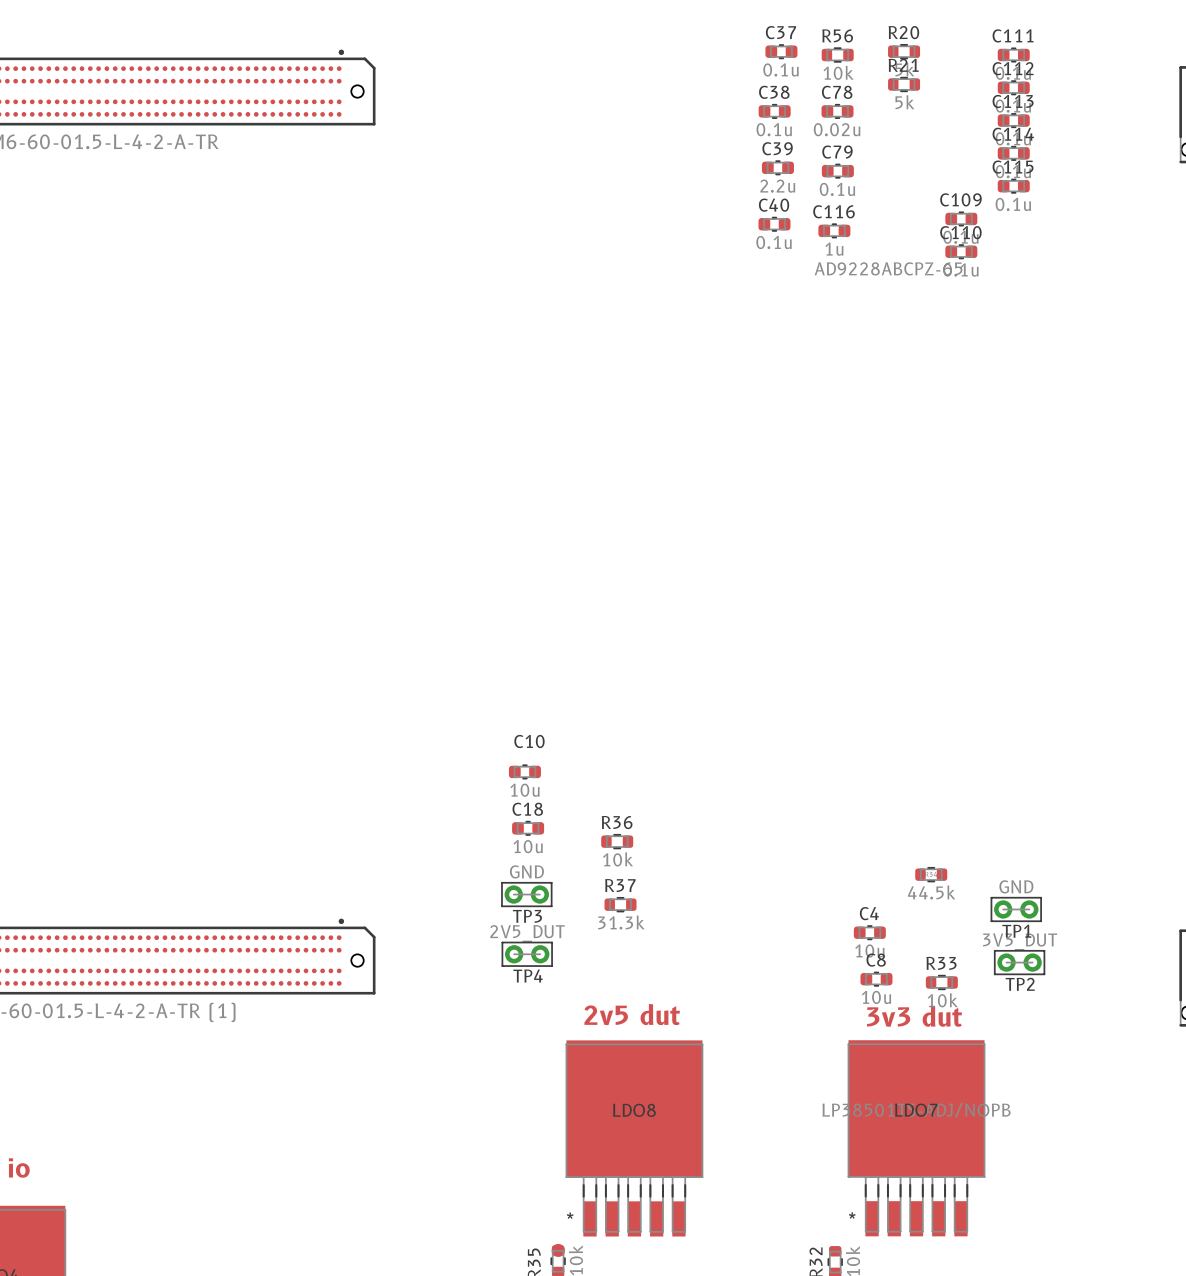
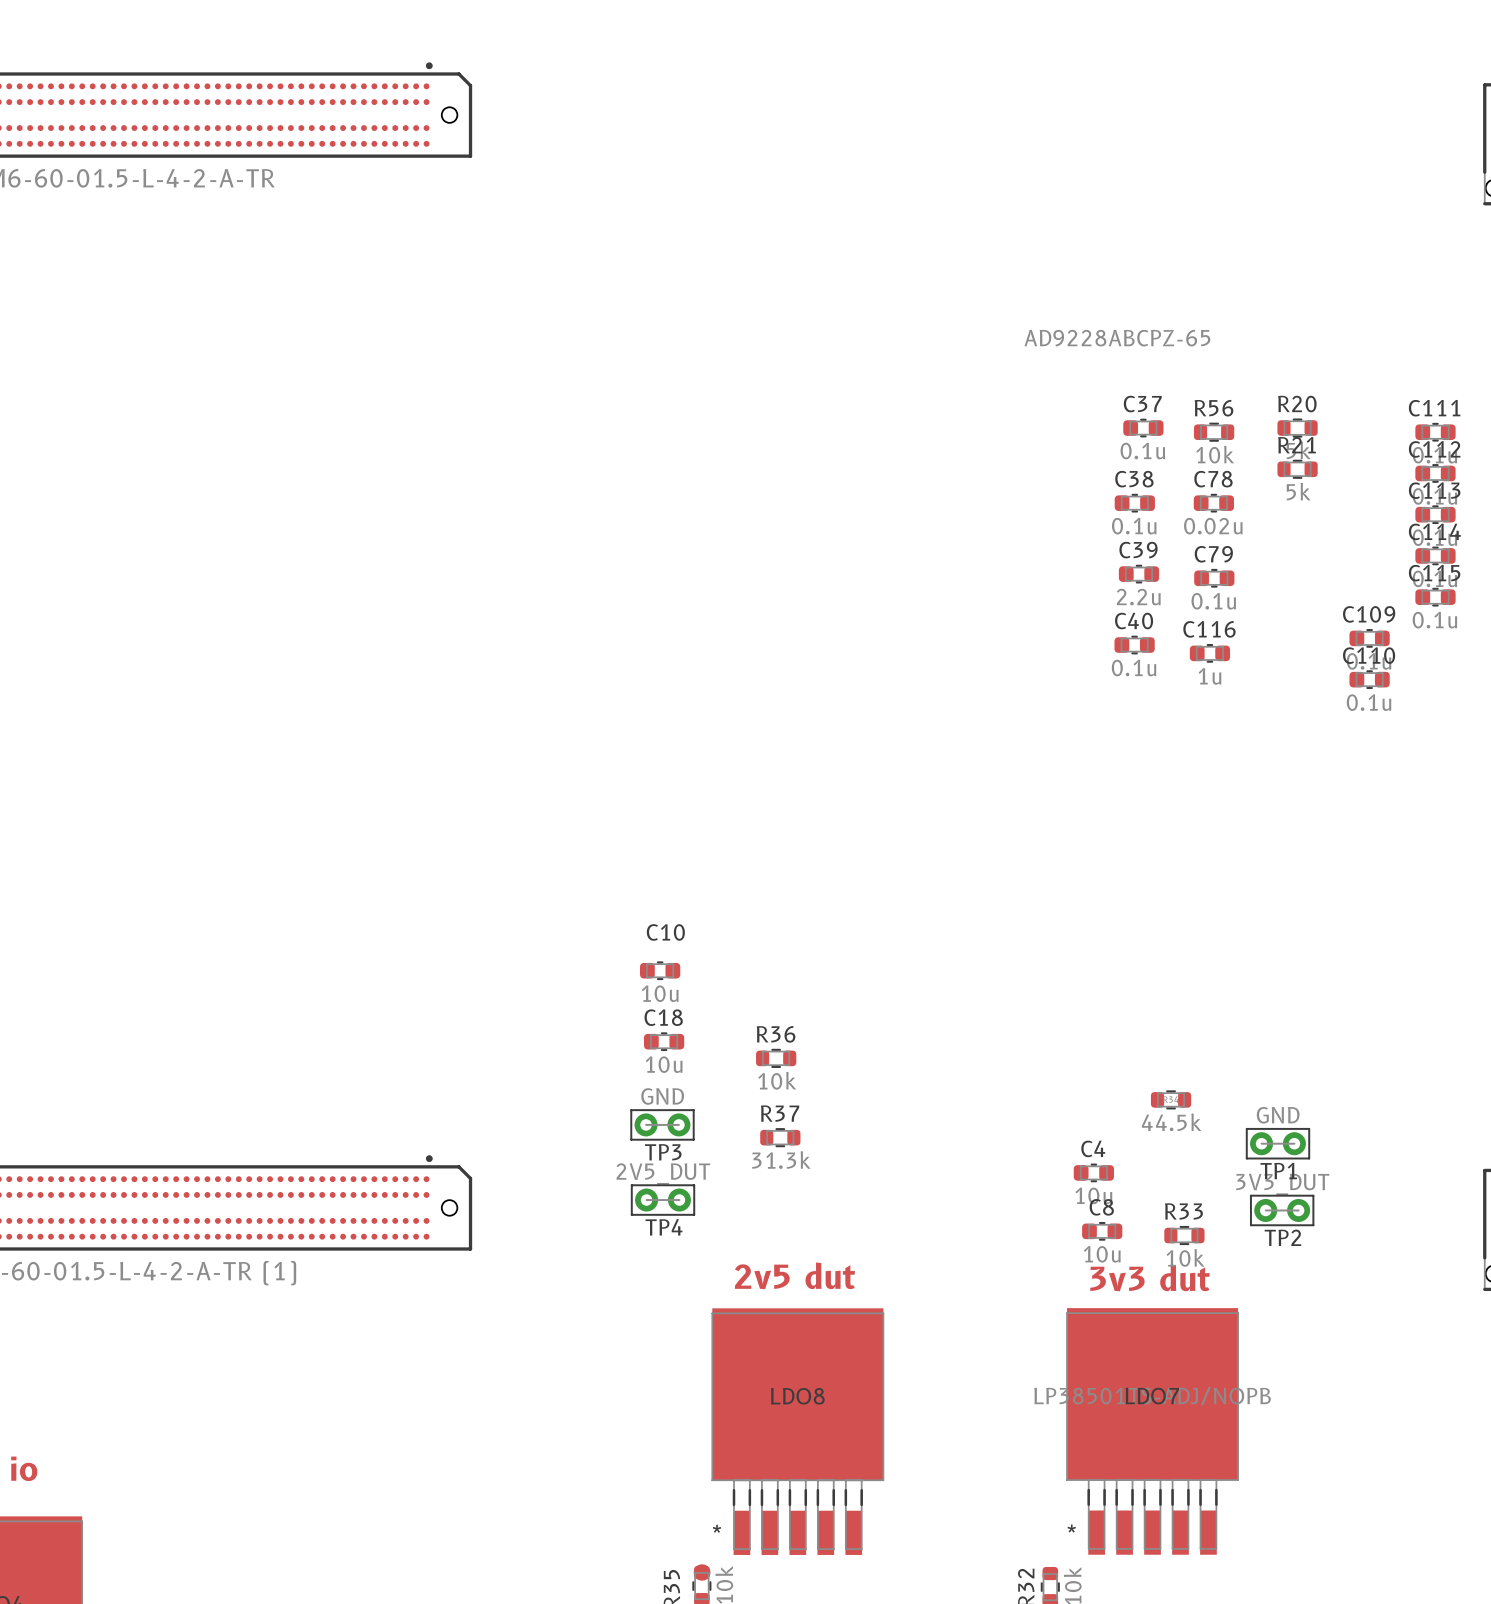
C37 position: (781, 51) -> (1143, 428)
R20 position: (904, 51) -> (1297, 428)
R56 position: (837, 55) -> (1214, 432)
C111 position: (1013, 55) -> (1435, 432)
R21 position: (904, 84) -> (1297, 469)
C112 position: (1013, 87) -> (1435, 473)
C38 position: (774, 111) -> (1134, 503)
C78 position: (837, 111) -> (1213, 503)
C113 position: (1013, 120) -> (1435, 514)
C114 position: (1013, 153) -> (1435, 555)
C39 position: (777, 167) -> (1138, 574)
C79 position: (837, 171) -> (1214, 578)
C115 position: (1013, 186) -> (1435, 597)
C109 position: (961, 218) -> (1369, 638)
C40 position: (774, 224) -> (1134, 645)
C116 position: (834, 230) -> (1209, 653)
C110 position: (961, 251) -> (1369, 679)

